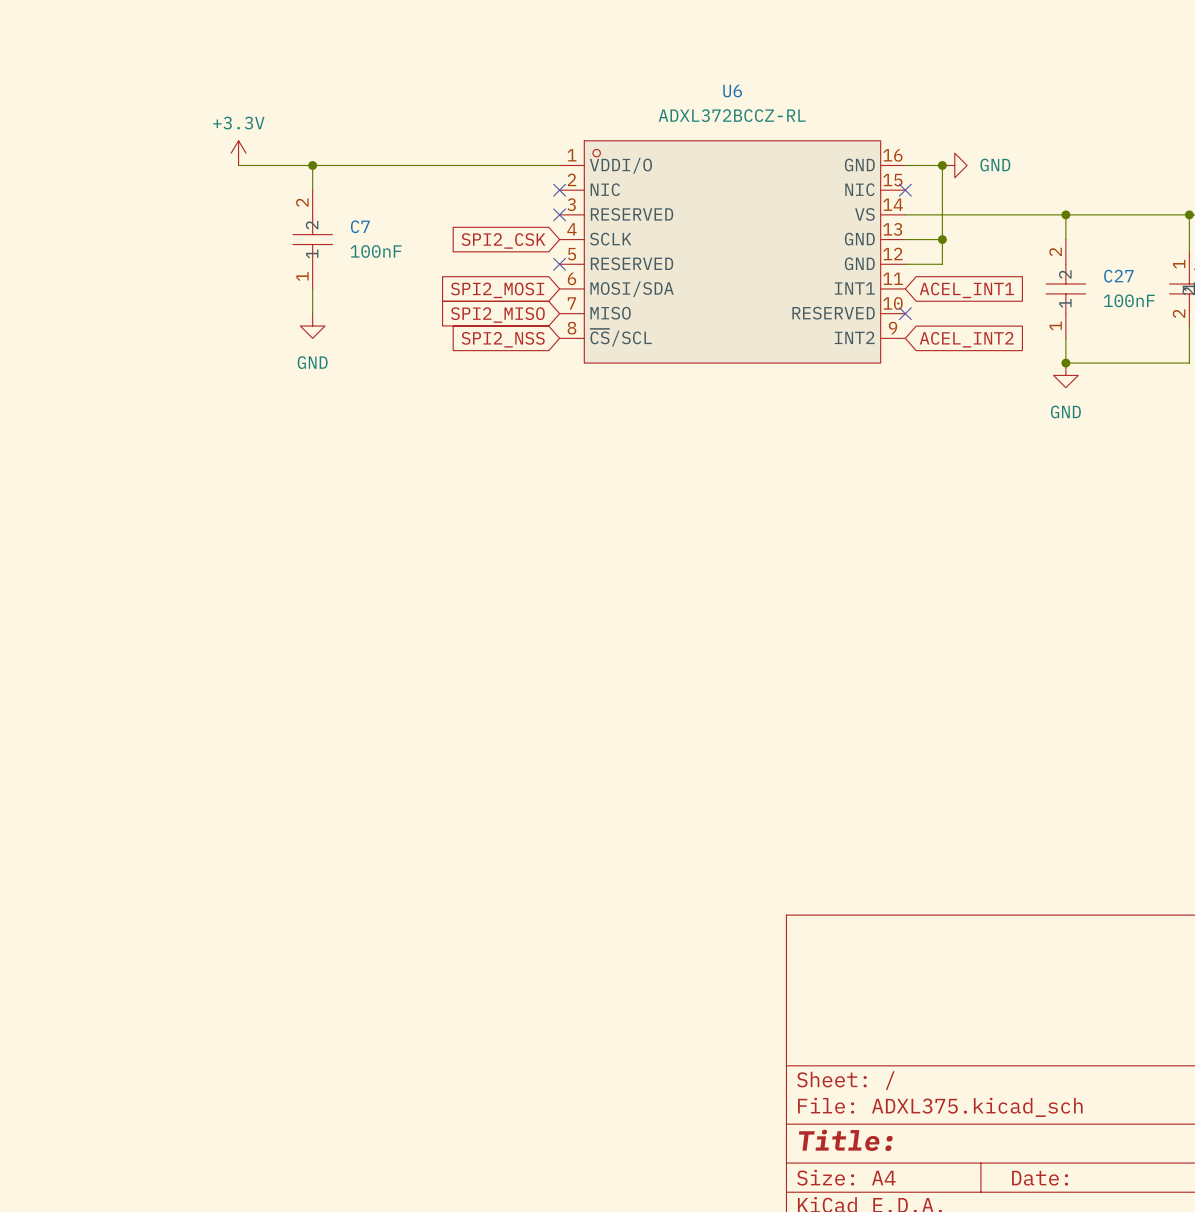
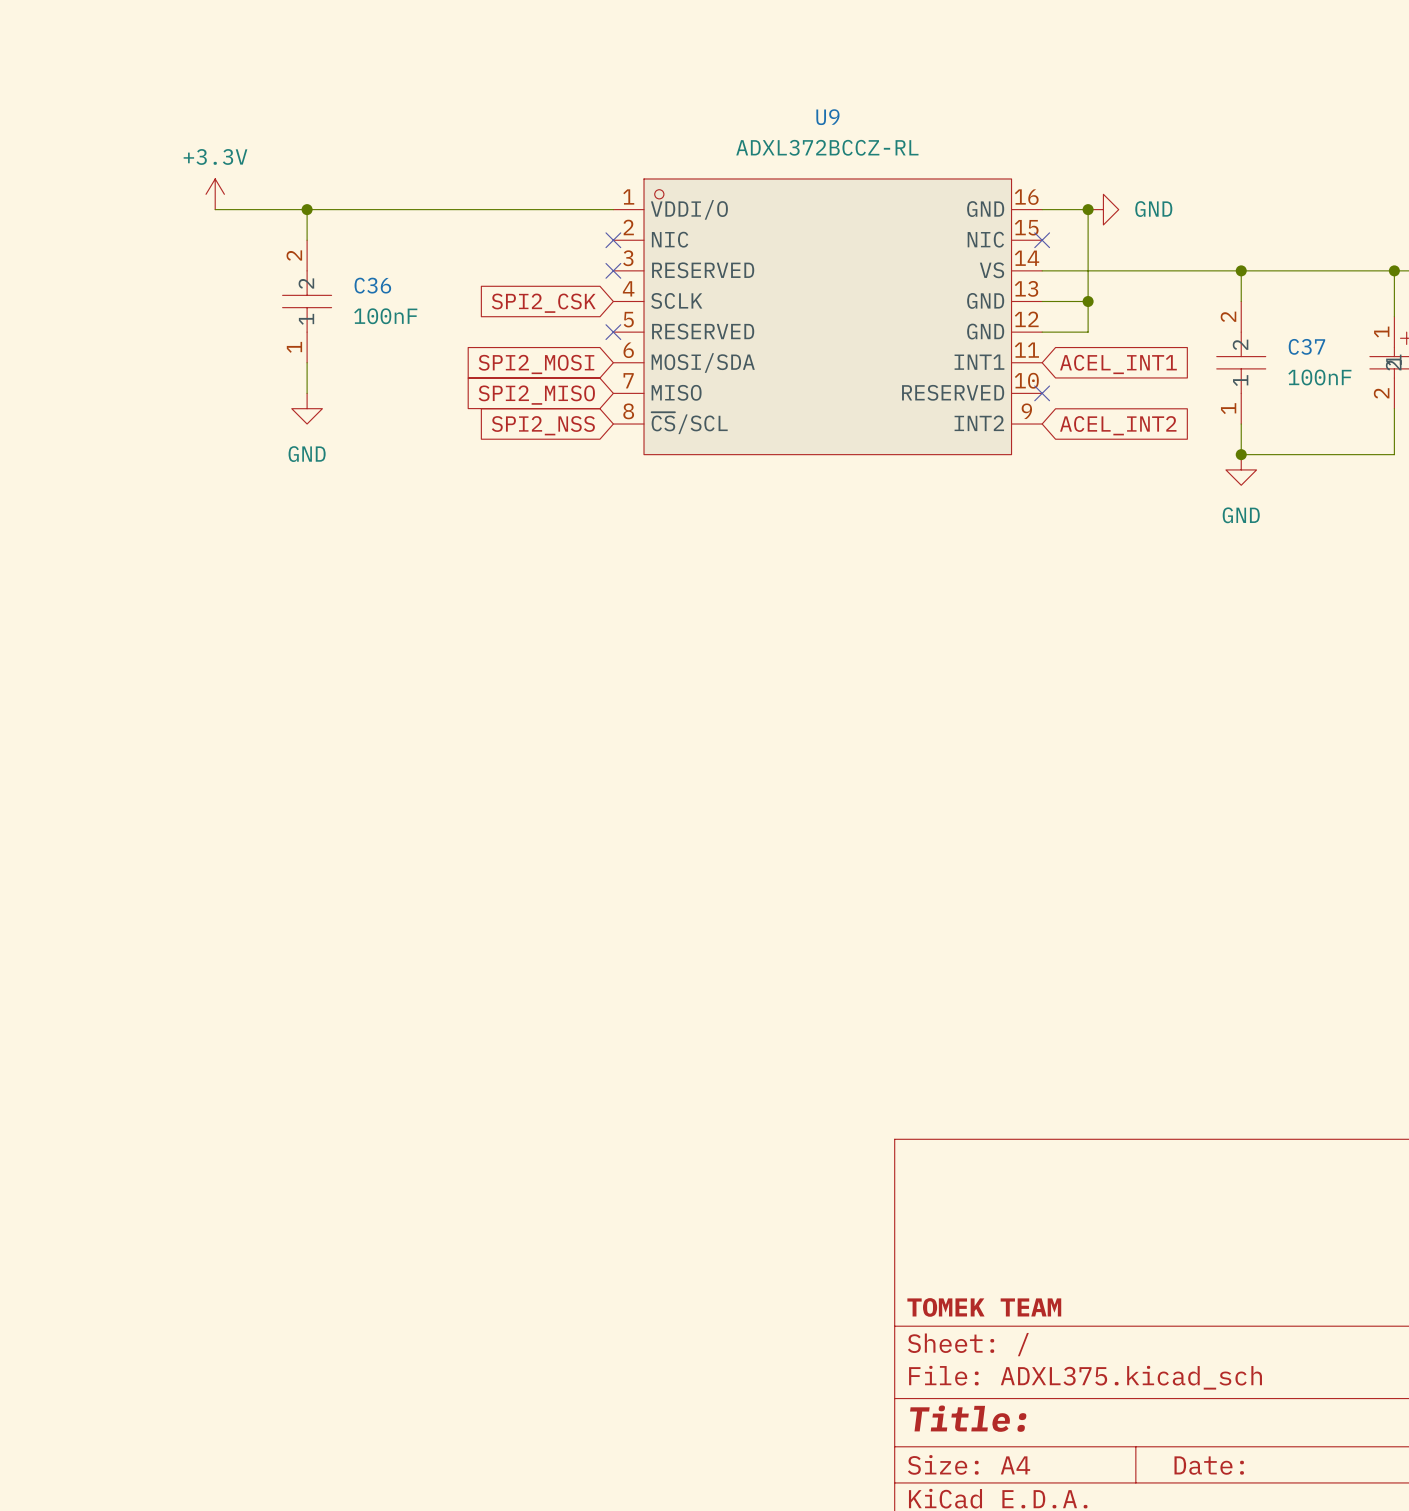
U6 name: U6 (732, 91) -> U9 (827, 117)
C7 name: C7 (360, 226) -> C36 (372, 285)
C27 name: C27 (1118, 276) -> C37 (1306, 346)
title block: none -> TOMEK TEAM (984, 1307)

